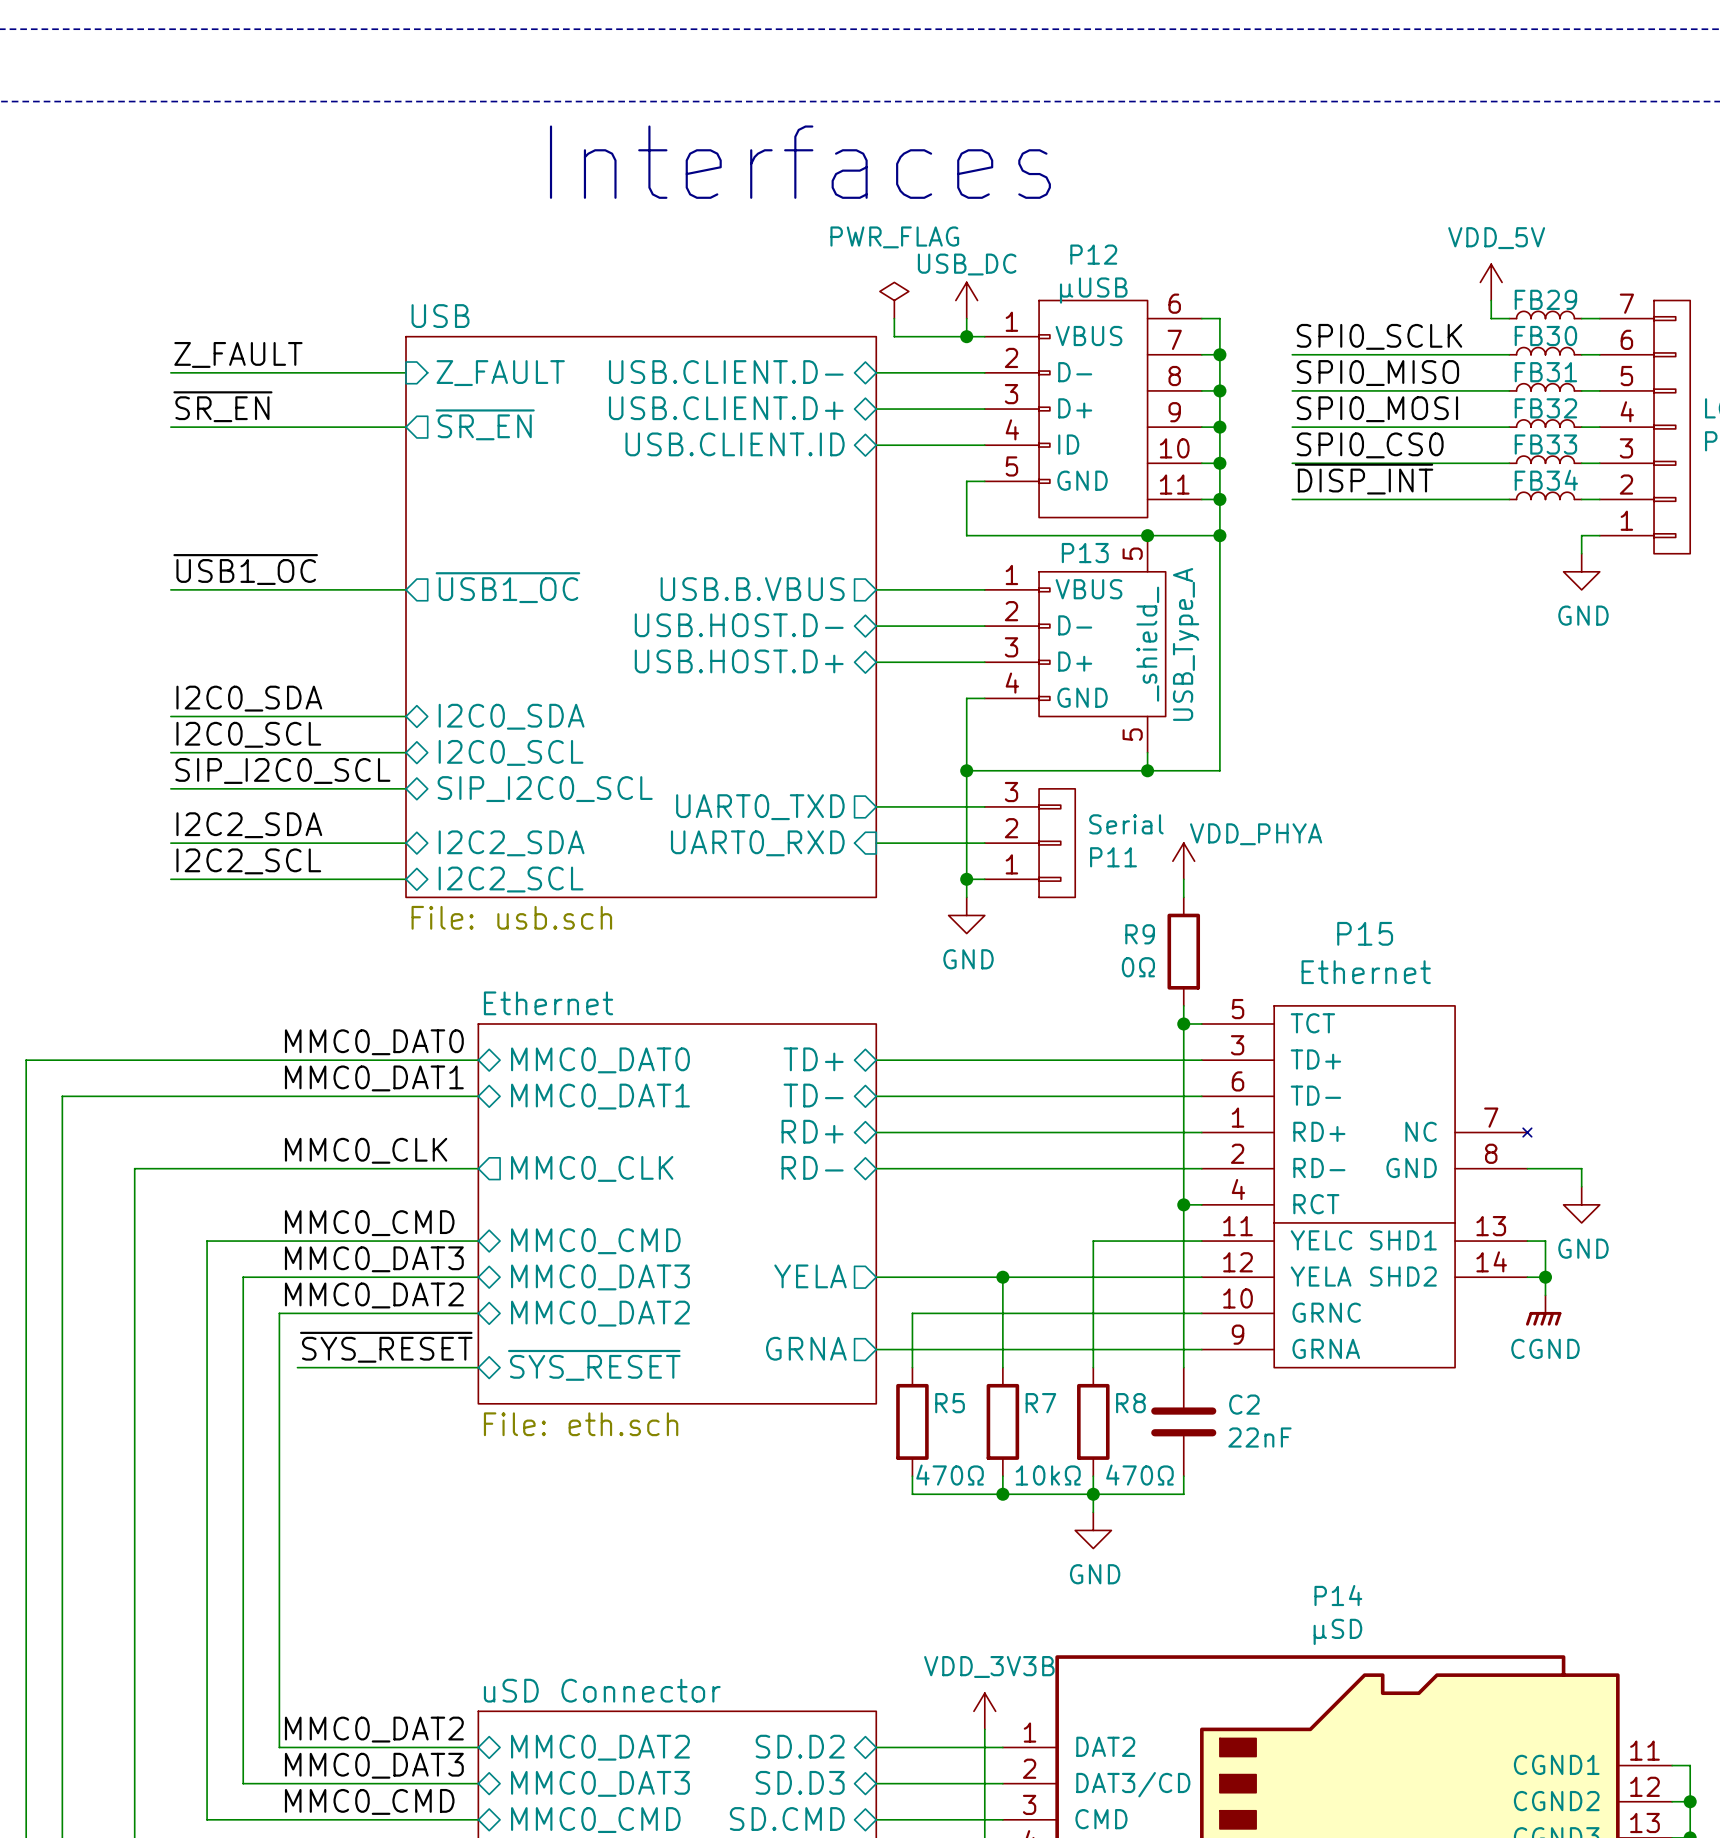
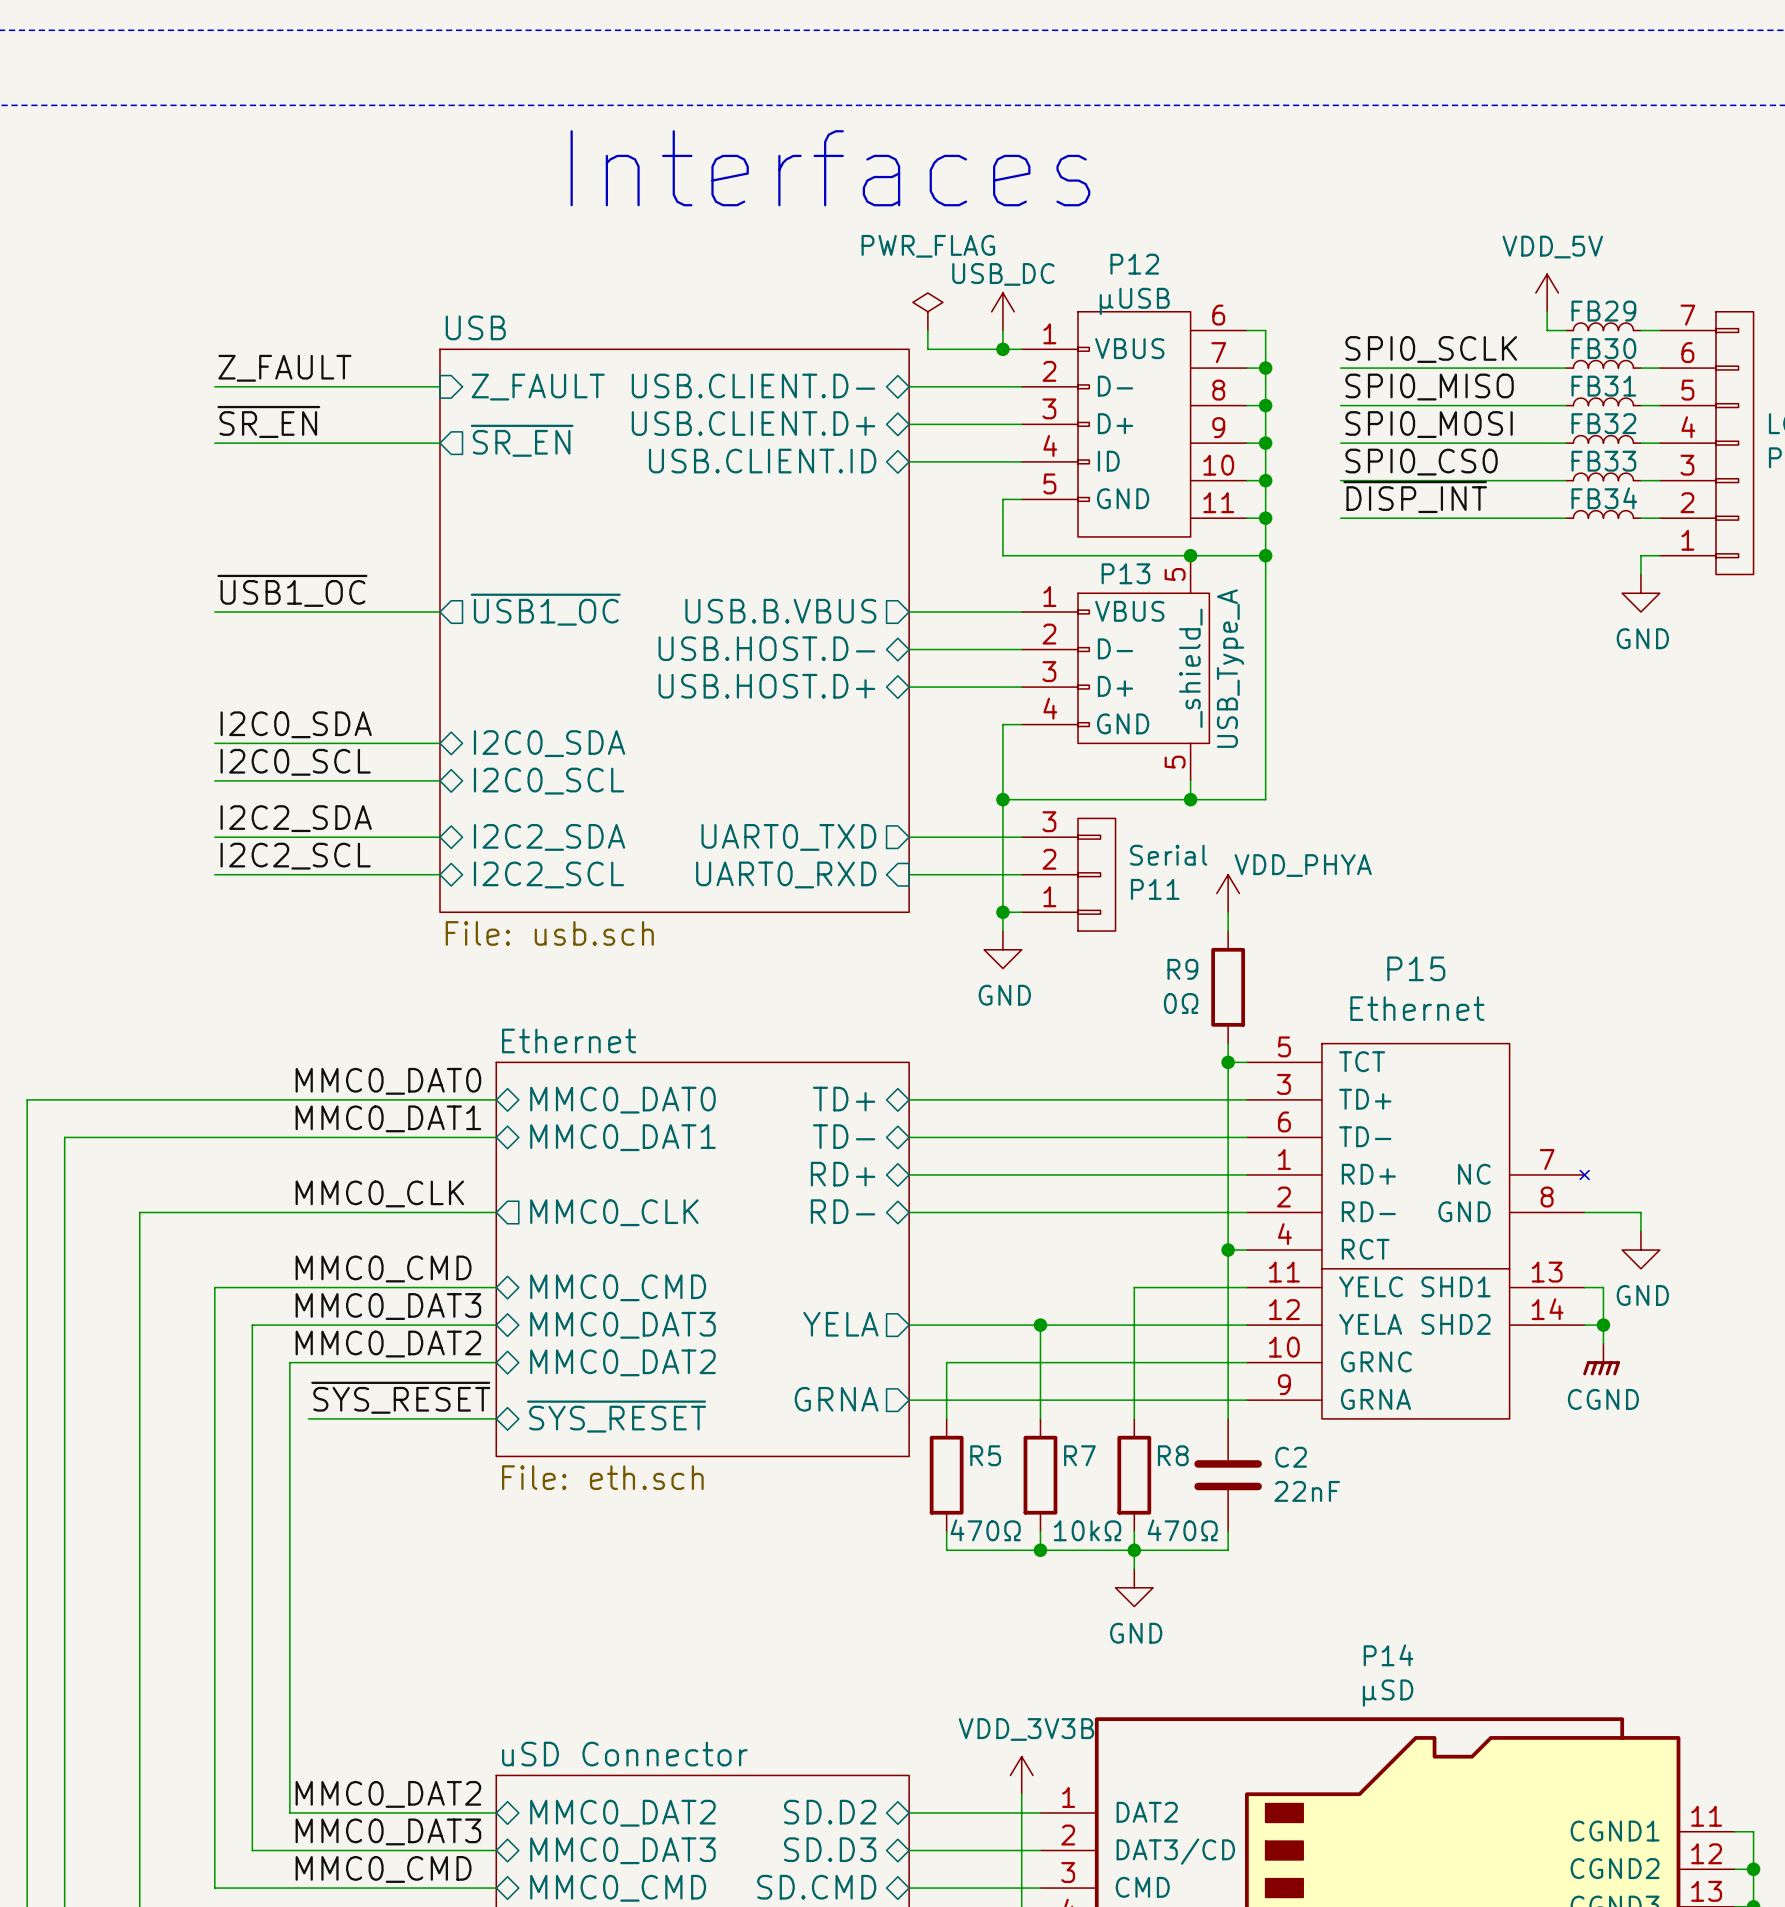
sheet USB shape: [406, 336, 877, 898] -> [439, 349, 910, 913]
label position: Z_FAULT (238, 354) -> Z_FAULT (284, 368)
wire: (170, 372) (207, 372) -> none
wire: none -> (421, 386) (439, 386)
sheet pin position: Z_FAULT (500, 373) -> Z_FAULT (538, 387)
label position: ~{SR_EN} (222, 406) -> ~{SR_EN} (268, 421)
sheet pin position: ~{SR_EN} (485, 424) -> ~{SR_EN} (522, 440)
wire: (170, 427) (207, 427) -> none
wire: none -> (421, 443) (439, 443)
label position: ~{USB1_OC} (245, 569) -> ~{USB1_OC} (292, 590)
sheet pin position: ~{USB1_OC} (507, 587) -> ~{USB1_OC} (545, 609)
wire: (170, 589) (207, 589) -> none
wire: none -> (421, 612) (439, 612)
label position: I2C0_SDA (249, 698) -> I2C0_SDA (296, 724)
wire: (170, 716) (207, 716) -> none
wire: none -> (421, 743) (439, 743)
sheet pin position: I2C0_SDA (511, 716) -> I2C0_SDA (549, 743)
label position: I2C0_SCL (248, 734) -> I2C0_SCL (295, 762)
wire: (170, 752) (207, 752) -> none
wire: none -> (421, 780) (439, 780)
sheet pin position: I2C0_SCL (511, 752) -> I2C0_SCL (548, 781)
label: SIP_I2C0_SCL (282, 770) -> none
wire: (170, 788) (406, 788) -> none
sheet pin: SIP_I2C0_SCL (545, 789) -> none
wire: none -> (214, 837) (439, 837)
label position: I2C2_SDA (249, 825) -> I2C2_SDA (296, 818)
wire: (170, 843) (207, 843) -> none
wire: none -> (421, 874) (439, 874)
sheet pin position: I2C2_SDA (511, 843) -> I2C2_SDA (549, 837)
label position: I2C2_SCL (248, 861) -> I2C2_SCL (295, 856)
wire: (170, 879) (406, 879) -> none
sheet pin position: I2C2_SCL (511, 879) -> I2C2_SCL (548, 874)

